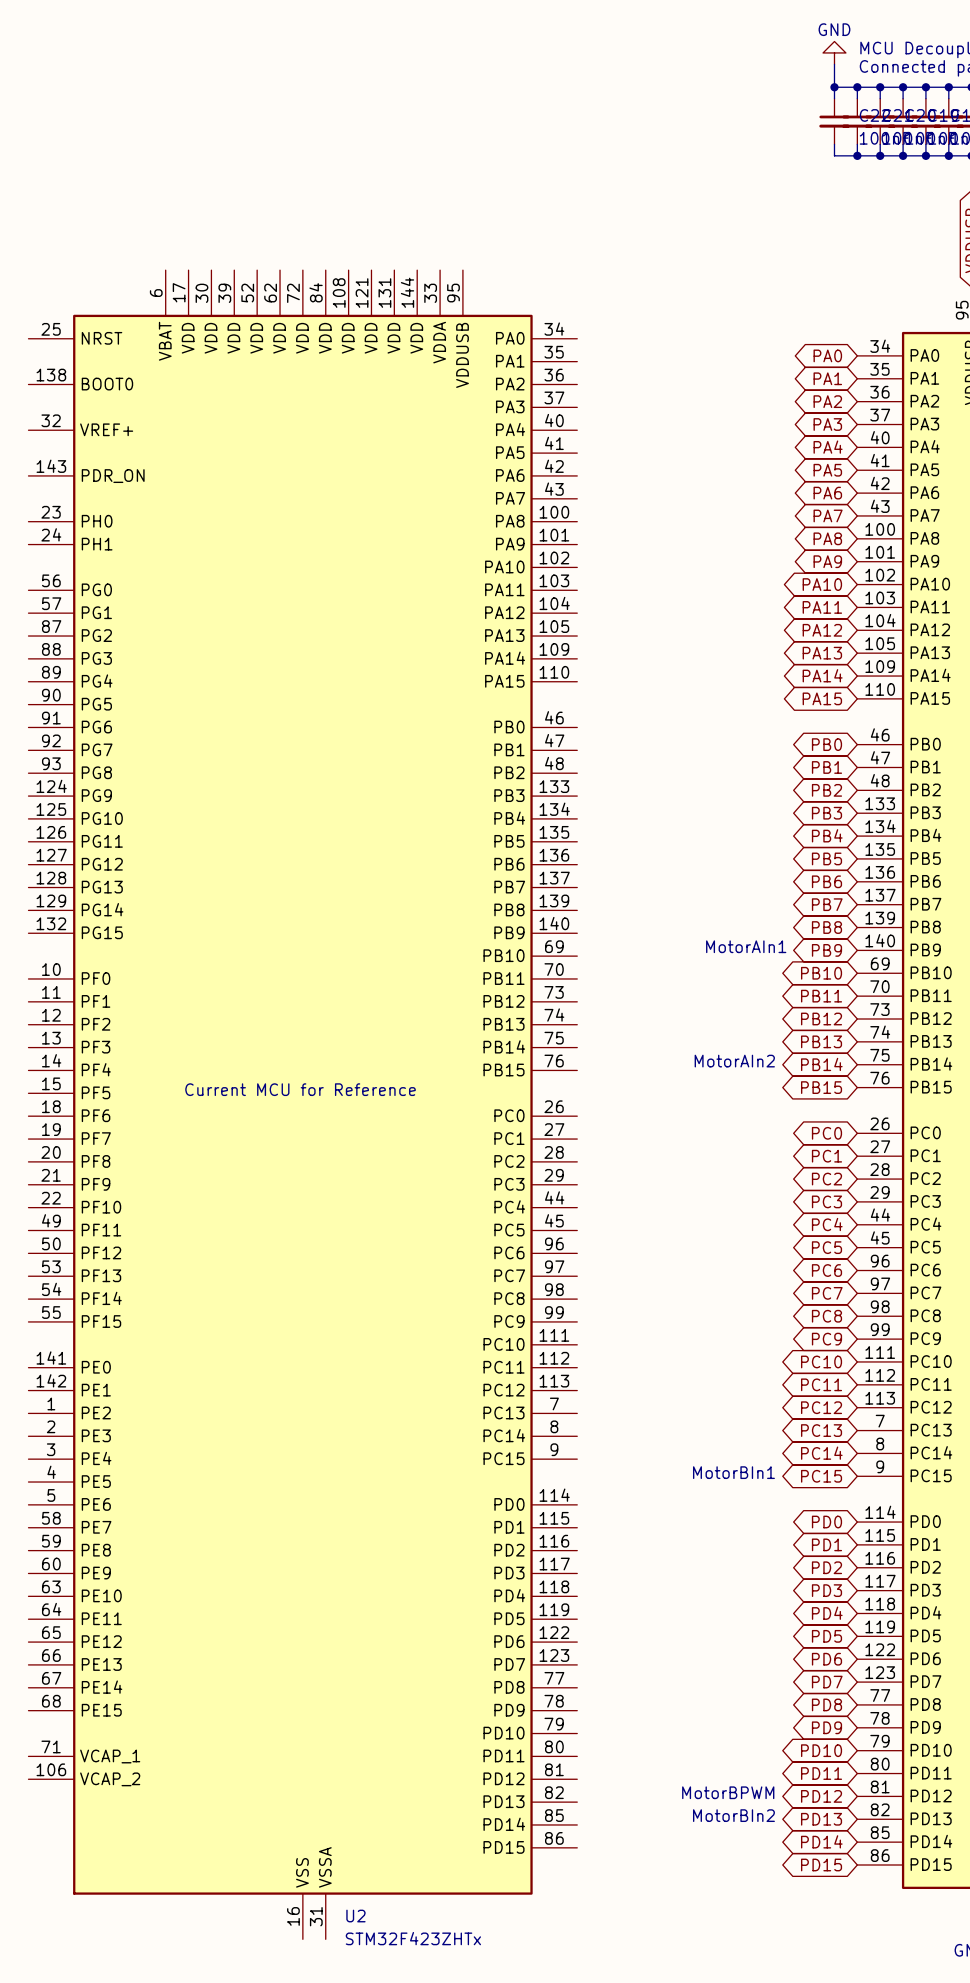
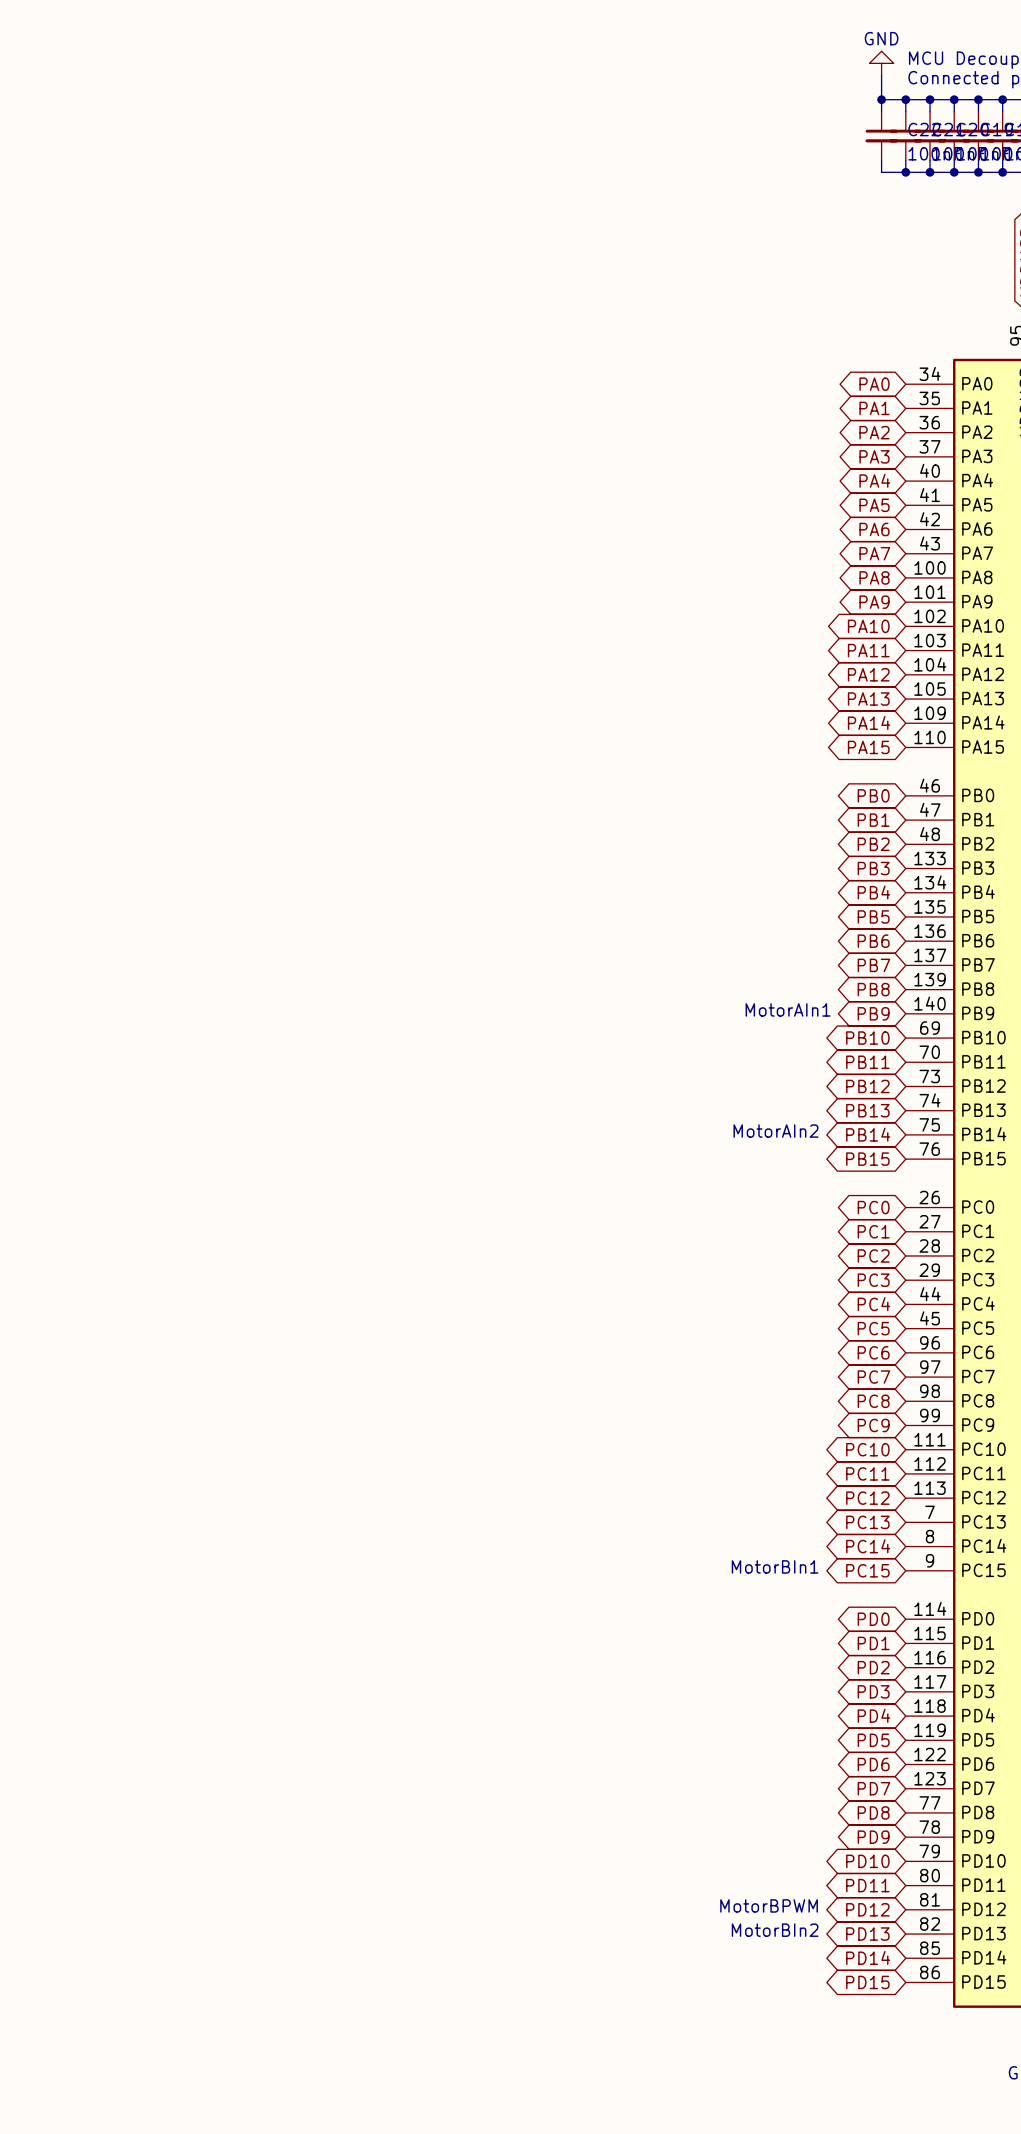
text: Current MCU for Reference (300, 1089) -> none
U2: STM32F423ZHTx (302, 1104) -> none

